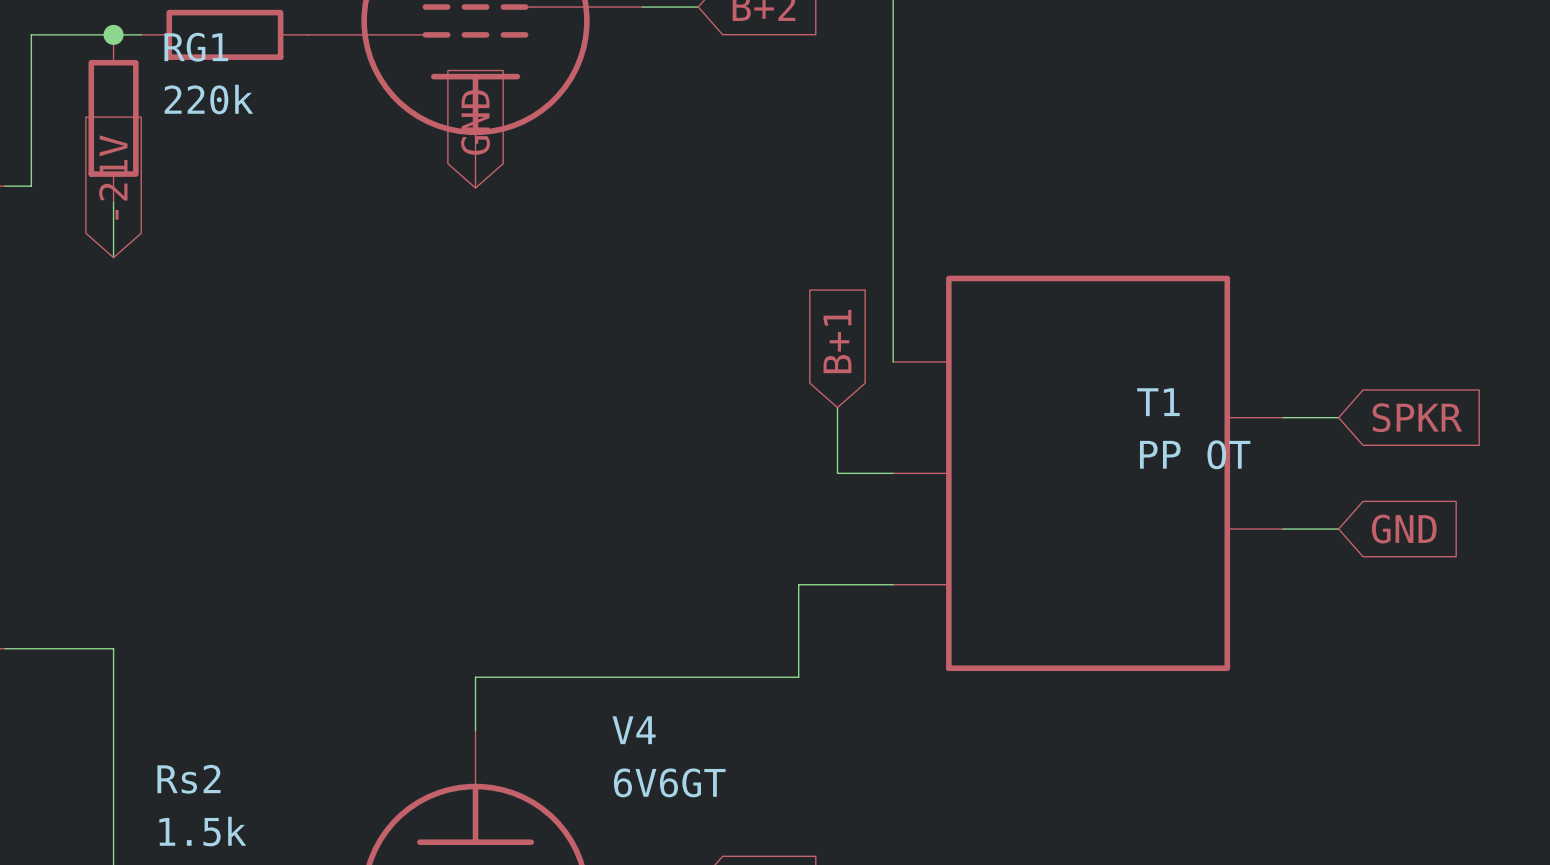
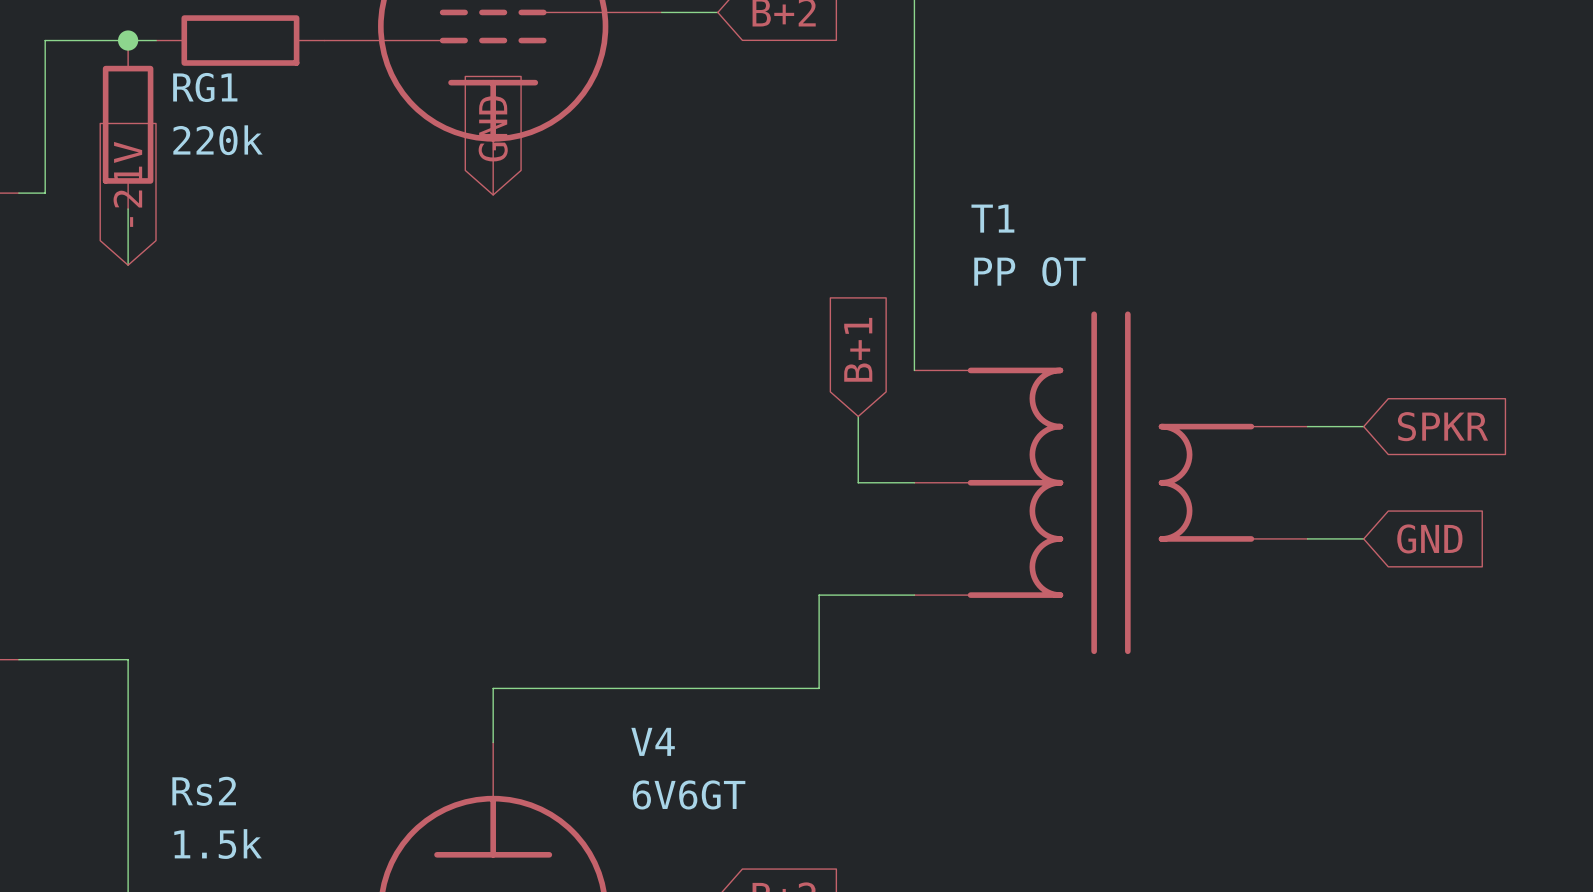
RG1 name position: RG1 (196, 47) -> RG1 (205, 87)
RG1 value position: 220k (208, 99) -> 220k (217, 140)
T1 symbol: [893, 275, 1283, 672] -> [914, 311, 1308, 655]
T1 name position: T1 (1158, 402) -> T1 (992, 218)
T1 value position: PP OT (1195, 454) -> PP OT (1029, 271)

